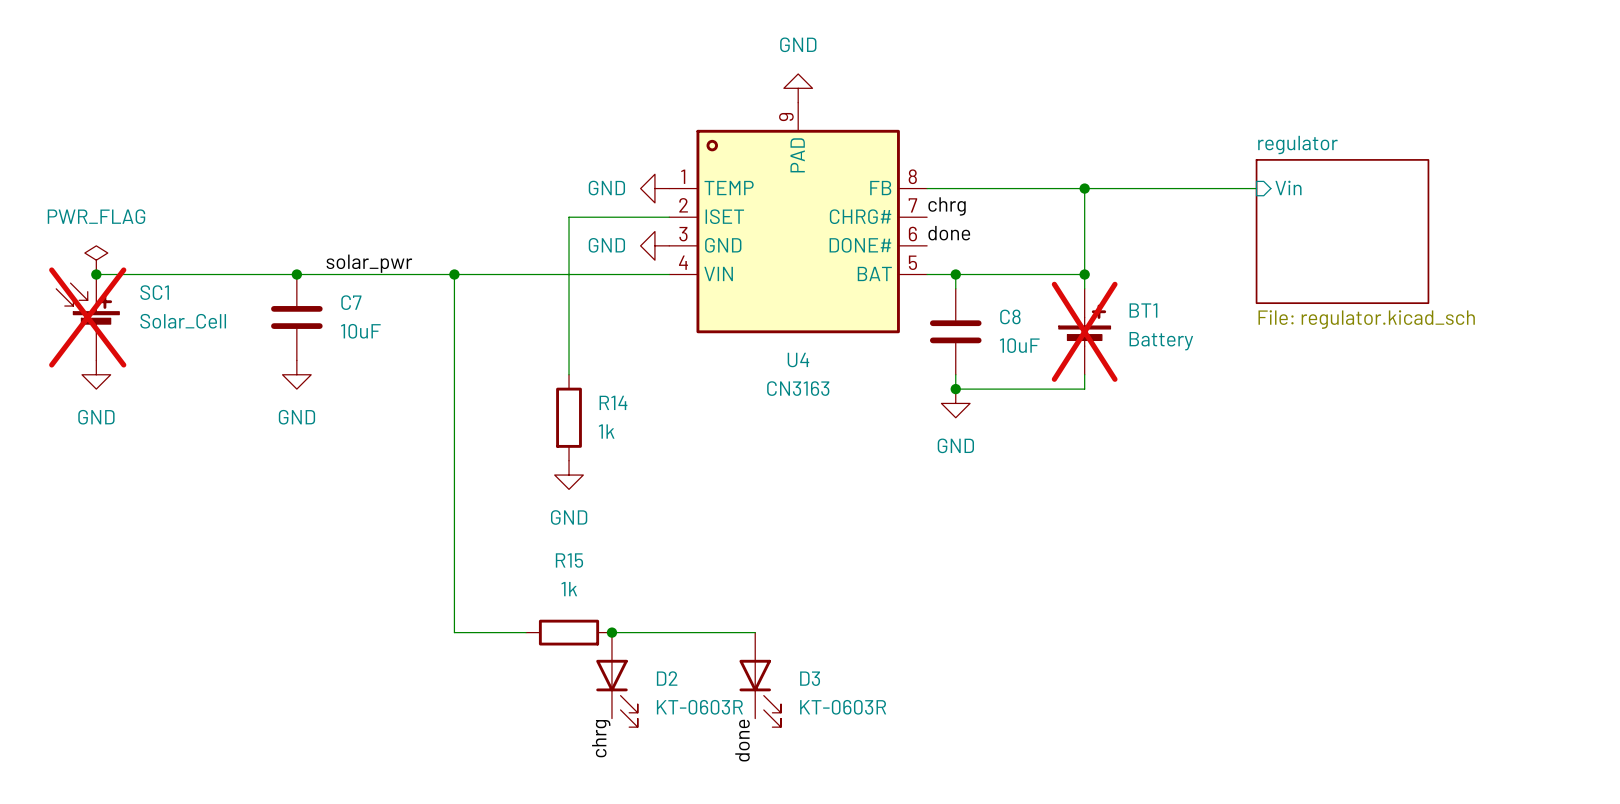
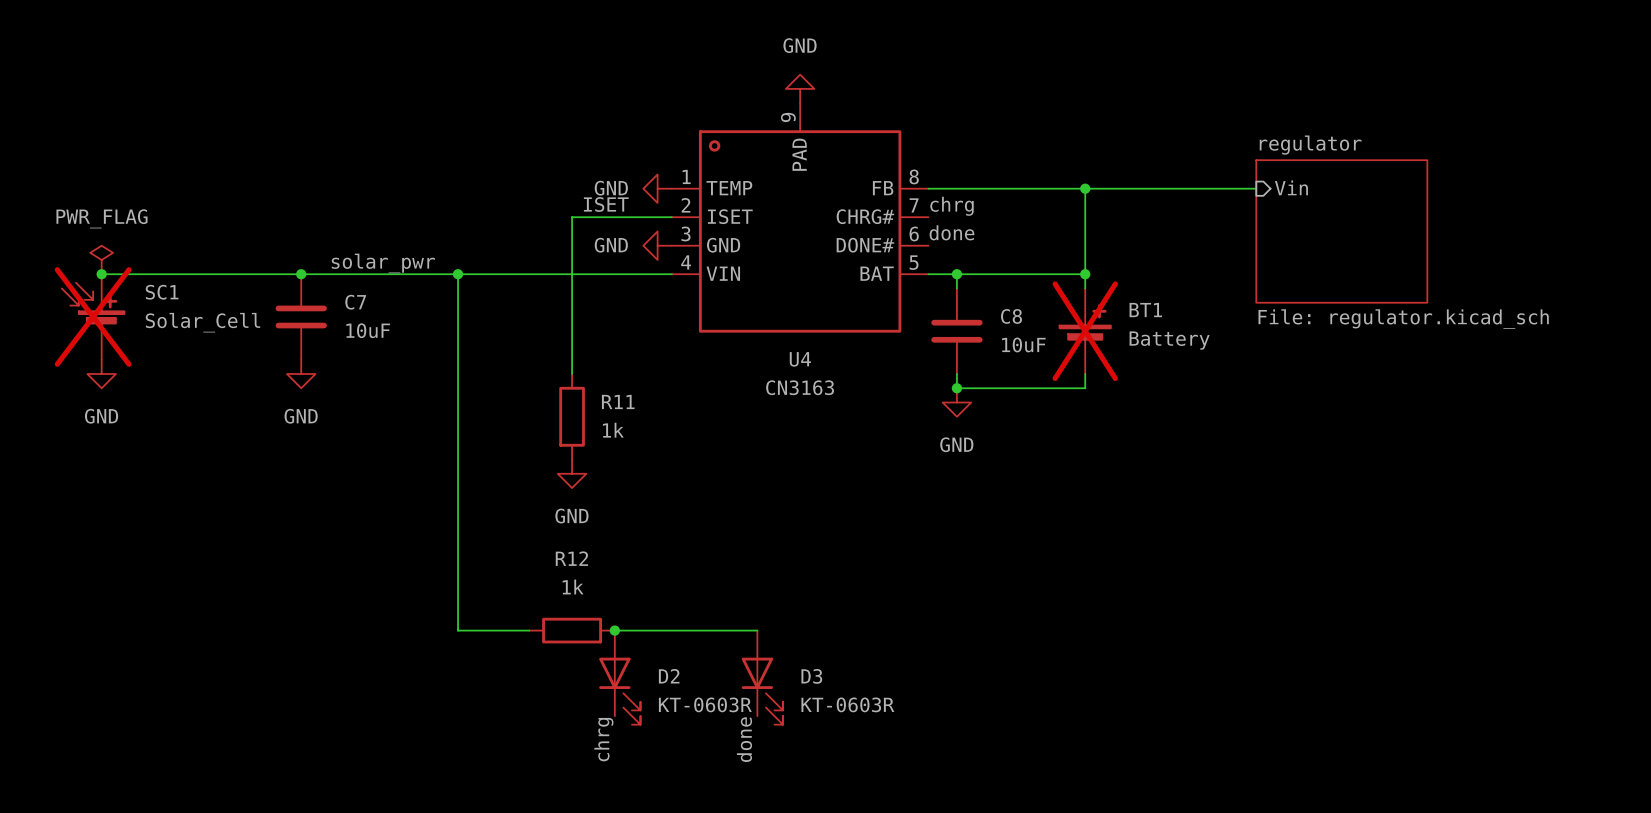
label: none -> ISET (606, 204)
R14 name: R14 (613, 402) -> R11 (618, 401)
R15 name: R15 (569, 560) -> R12 (571, 558)

